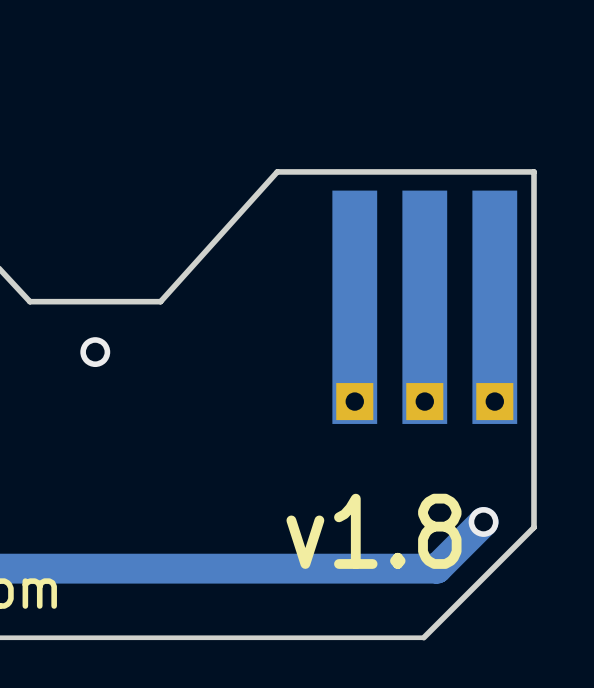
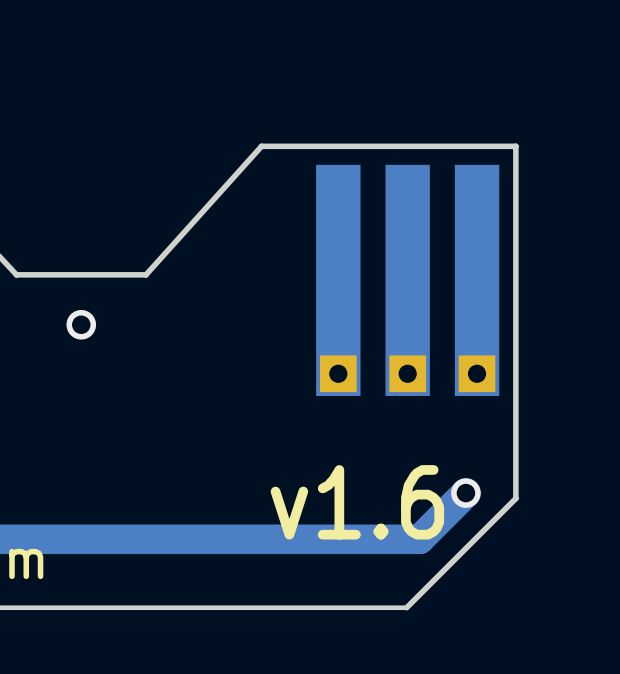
text: v1.8 (374, 531) -> v1.6 (357, 502)

